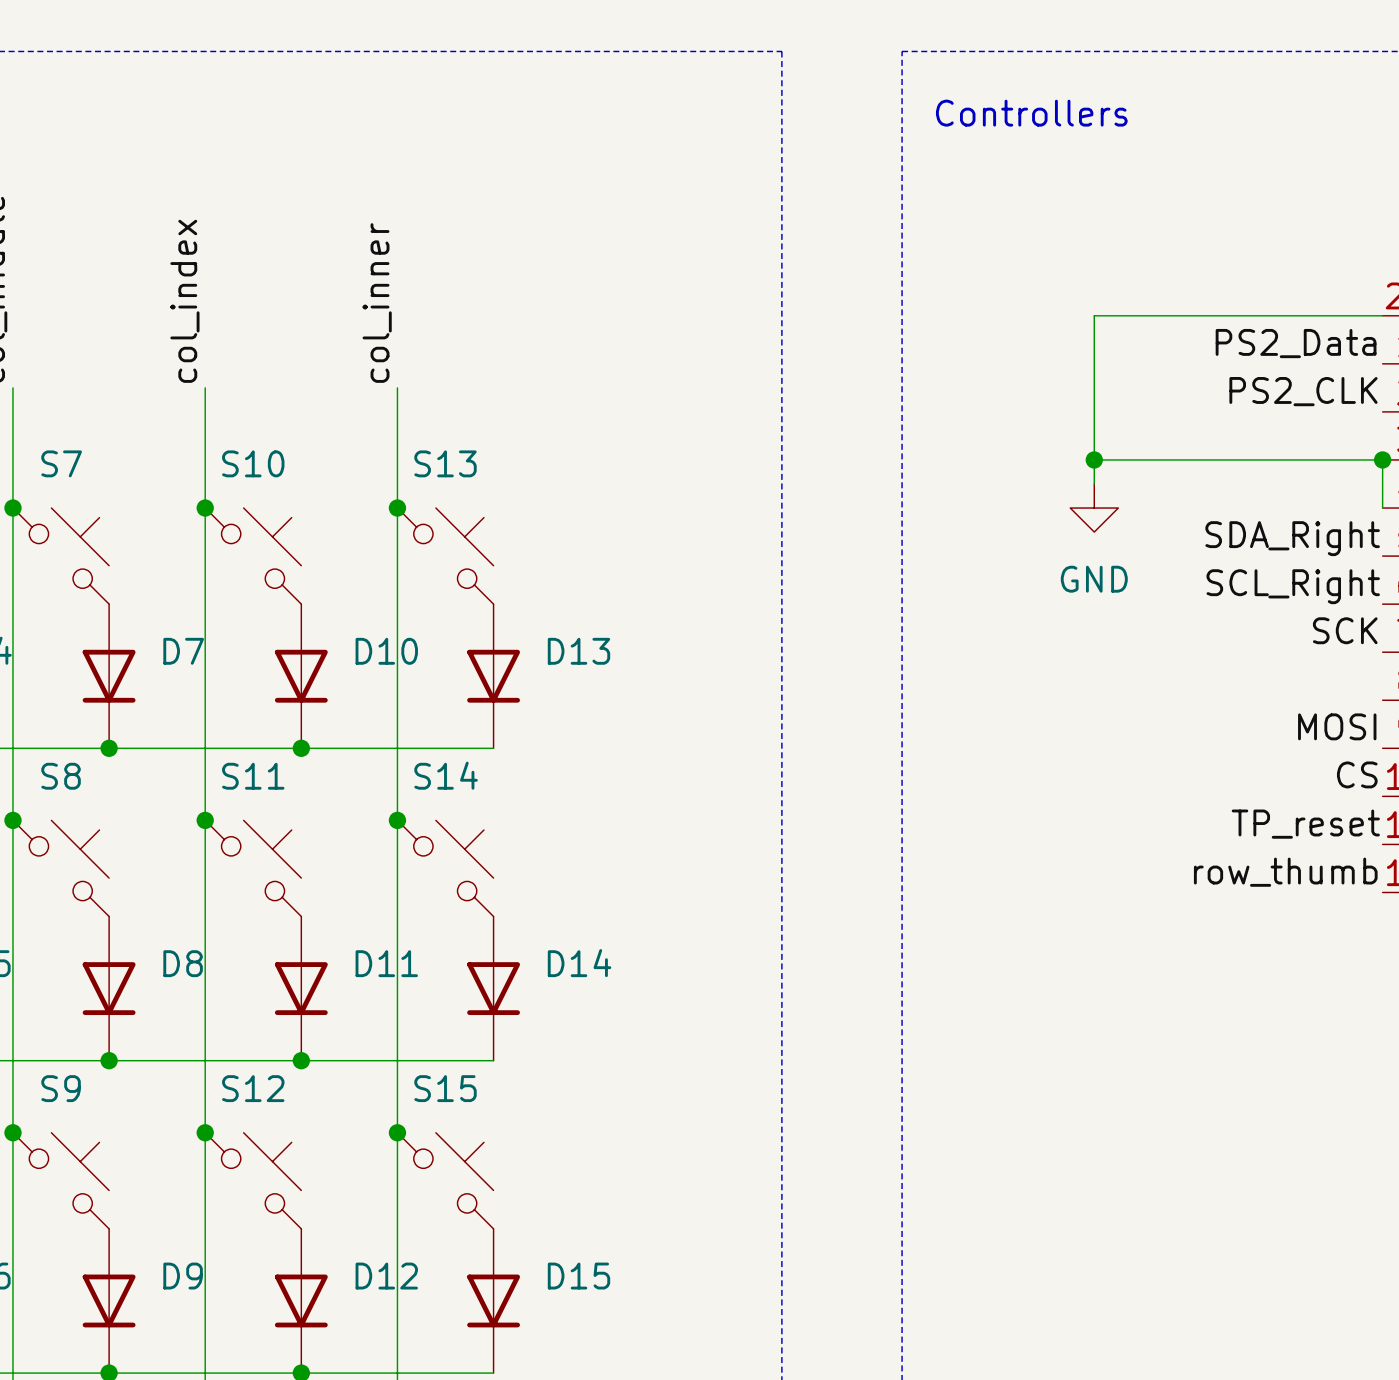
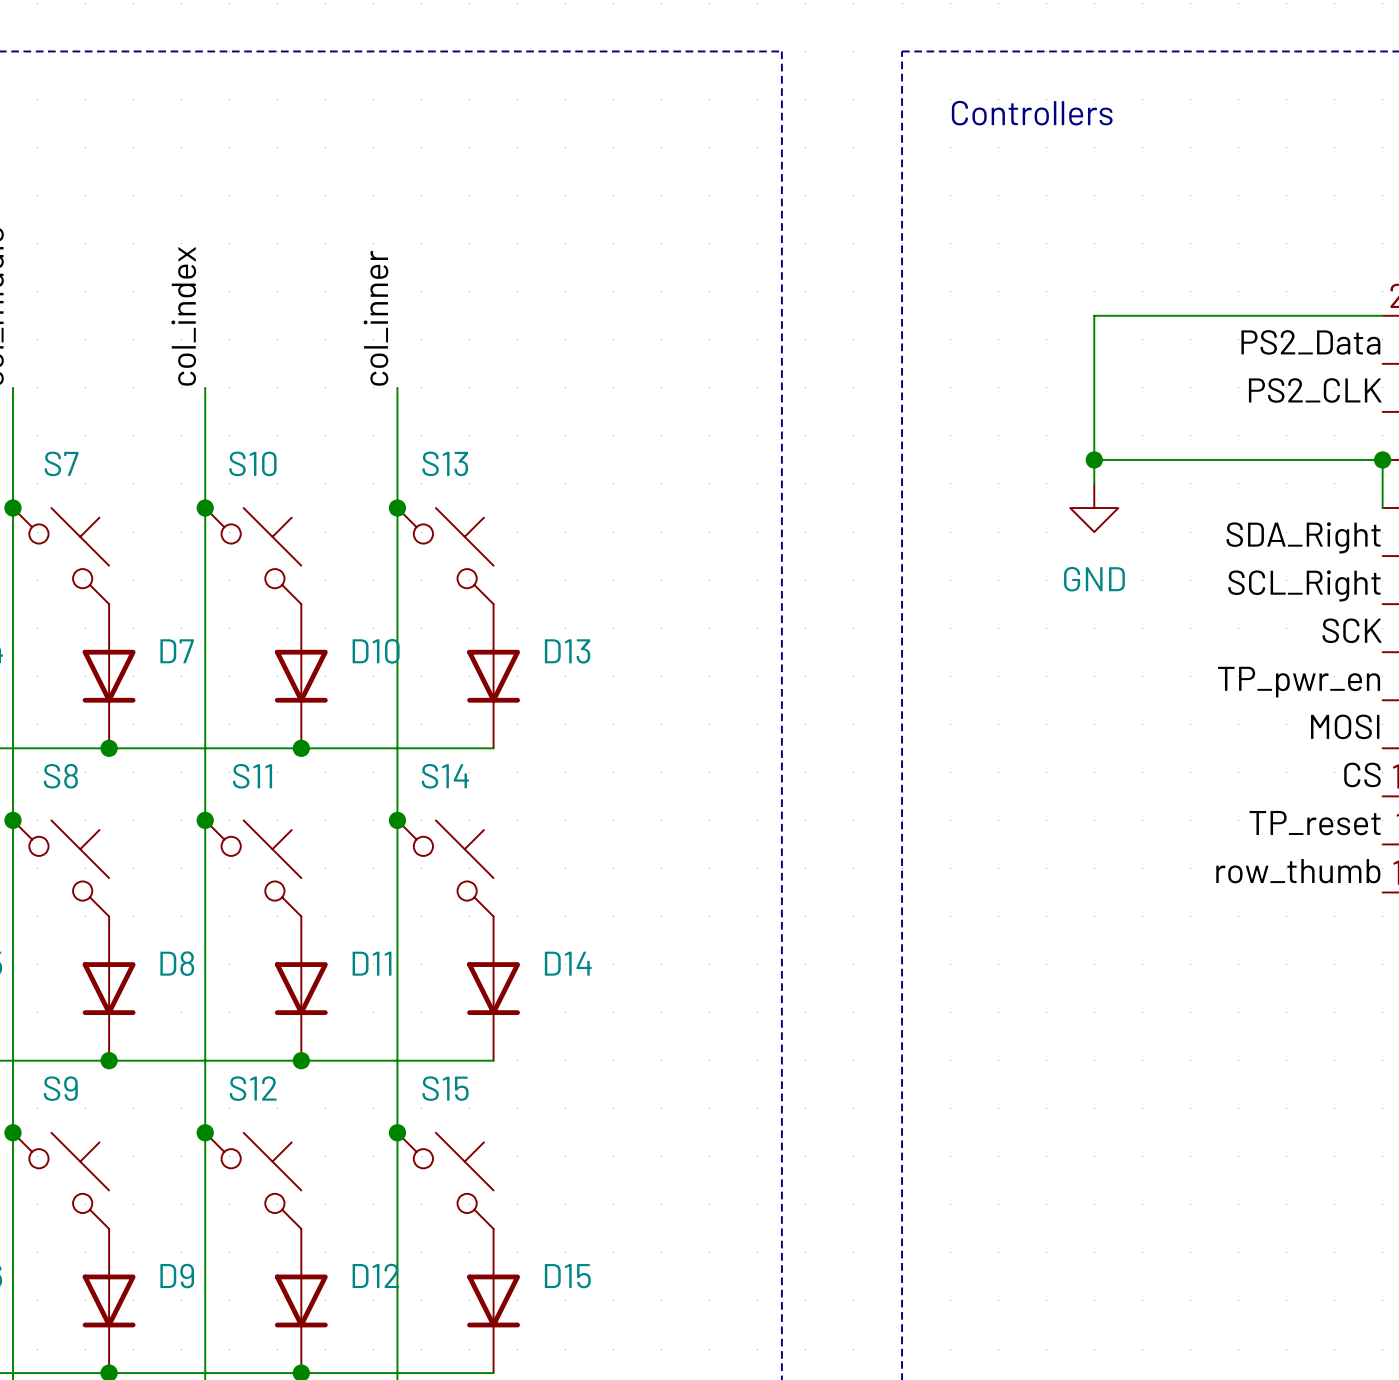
label: none -> TP_pwr_en (1299, 682)

